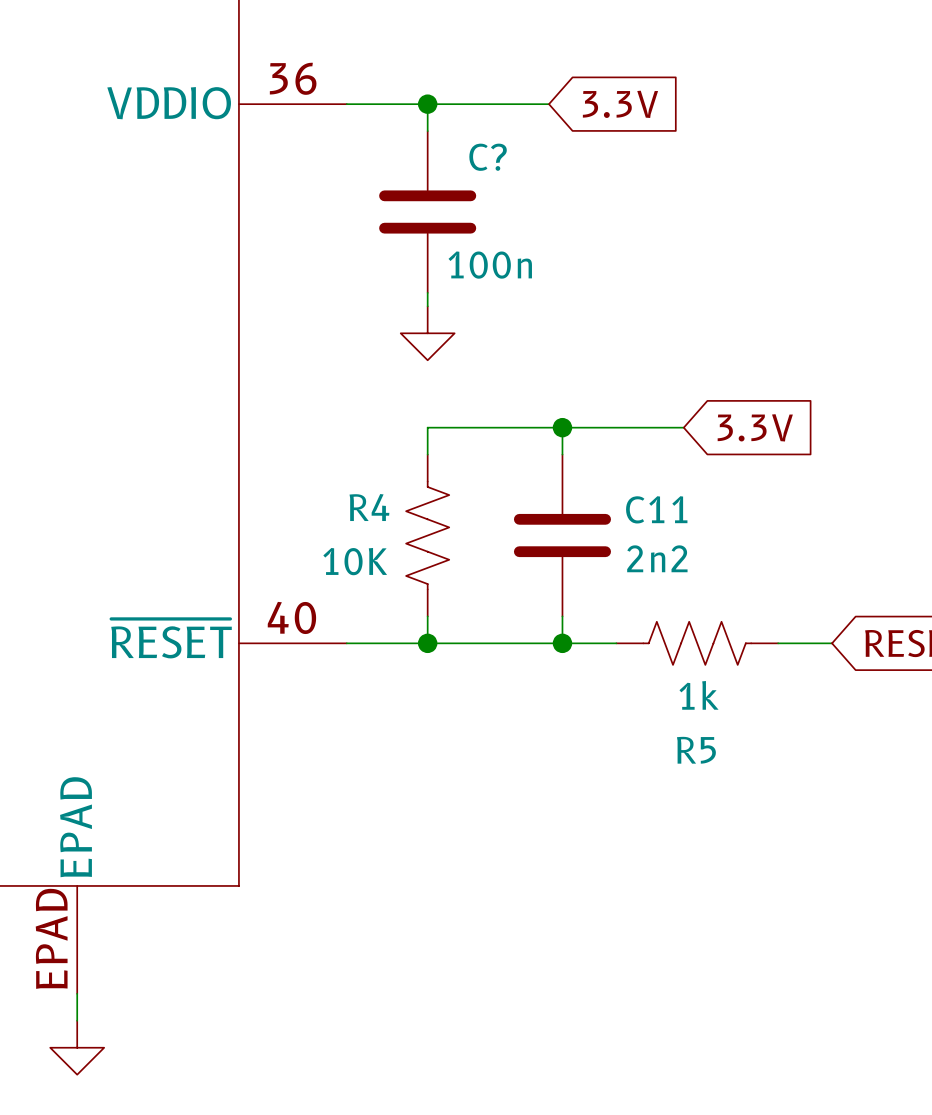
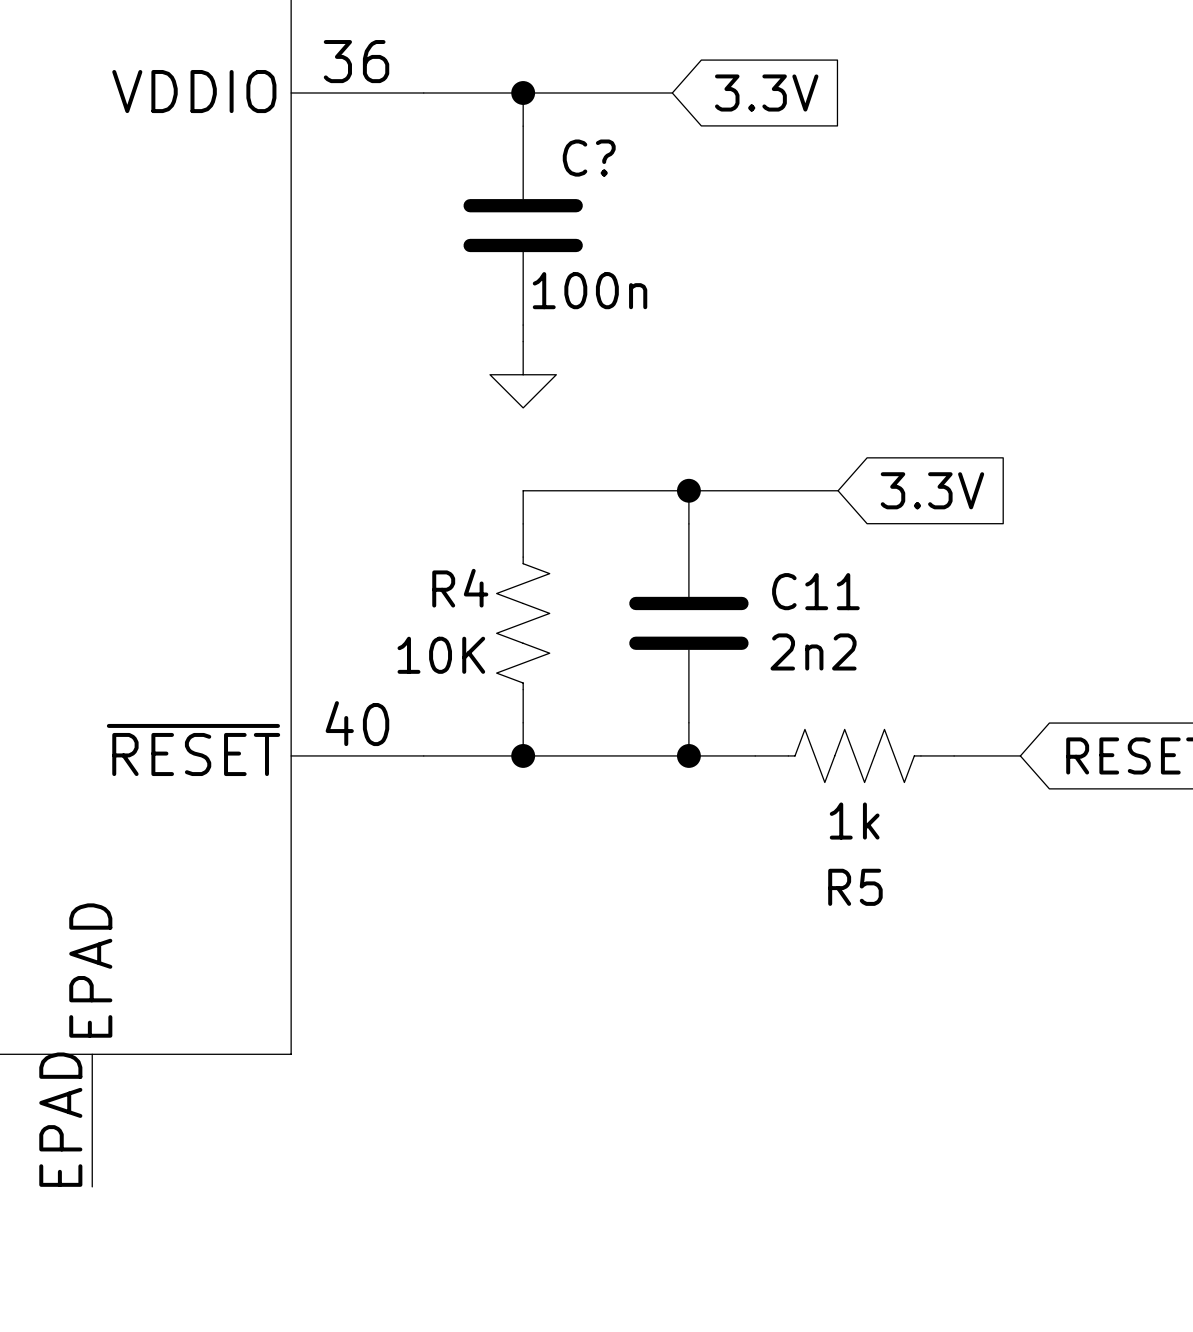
wire: (77, 993) (77, 1020) -> none
power symbol: (77, 1047) -> none

